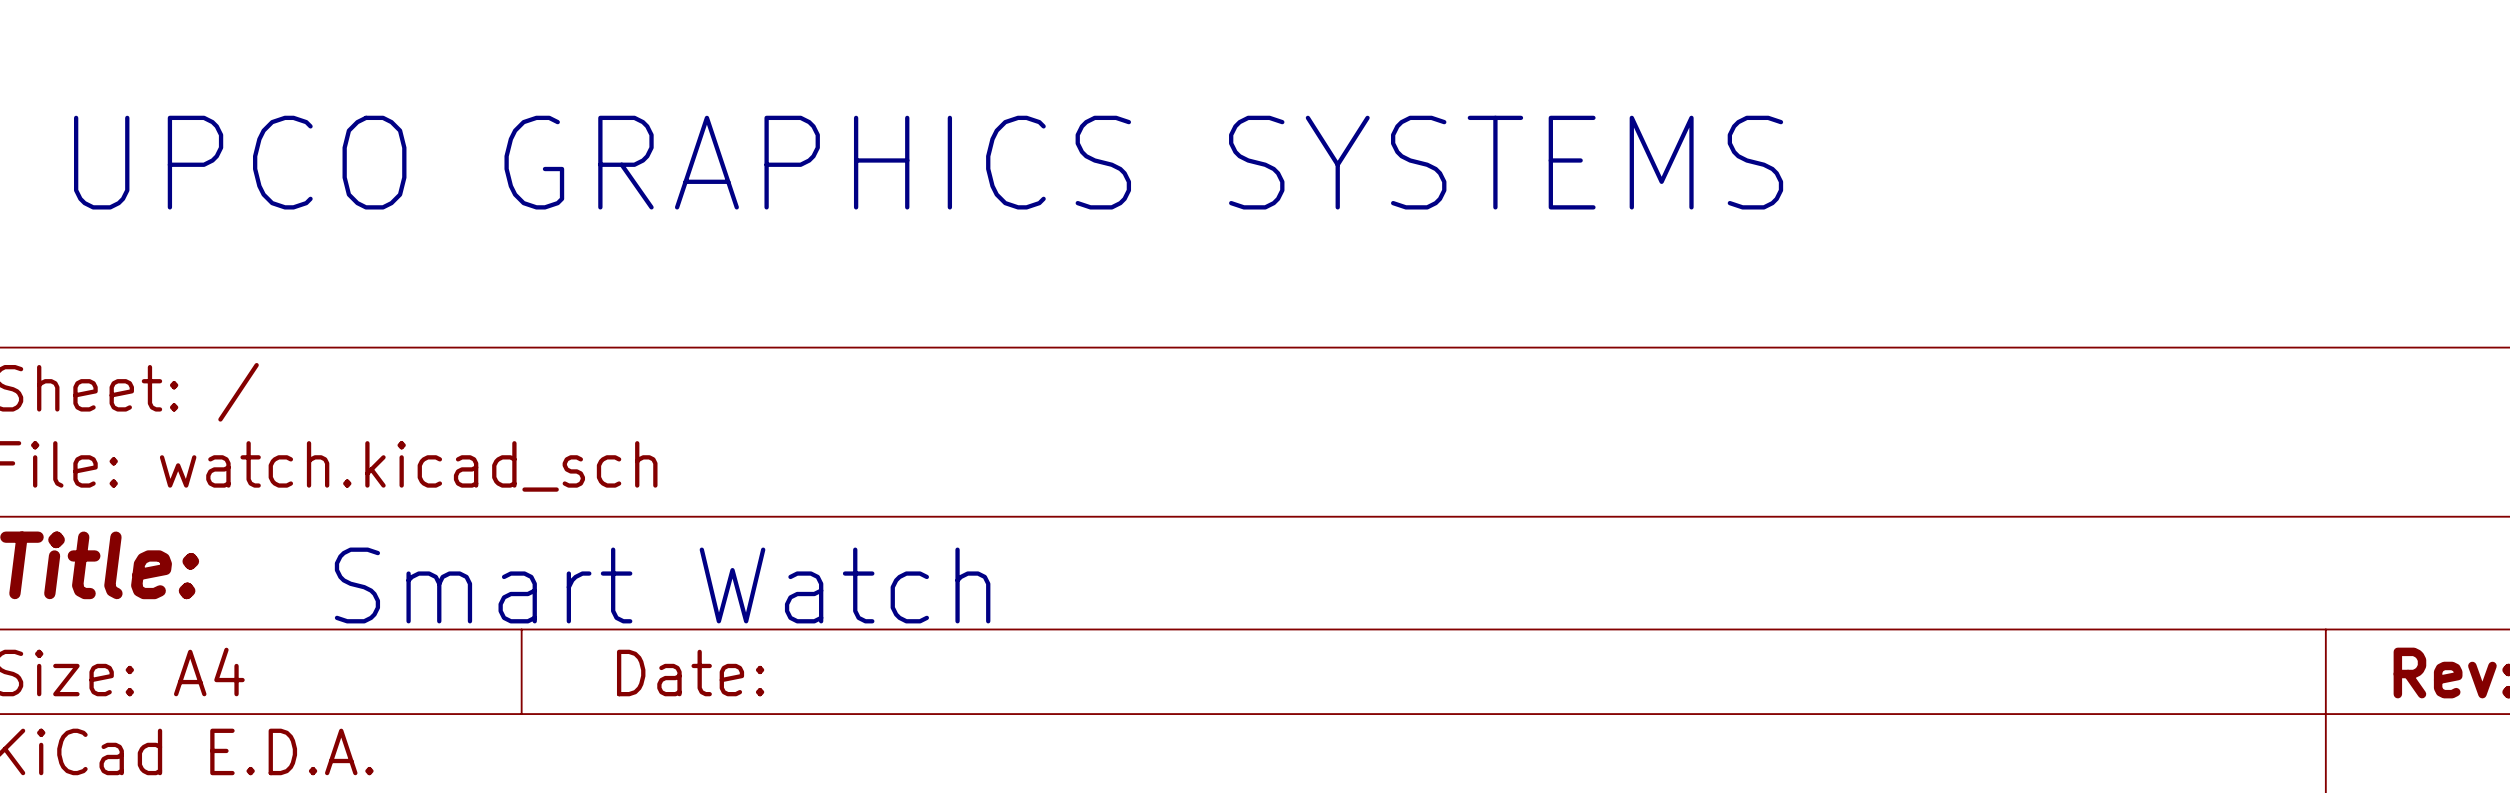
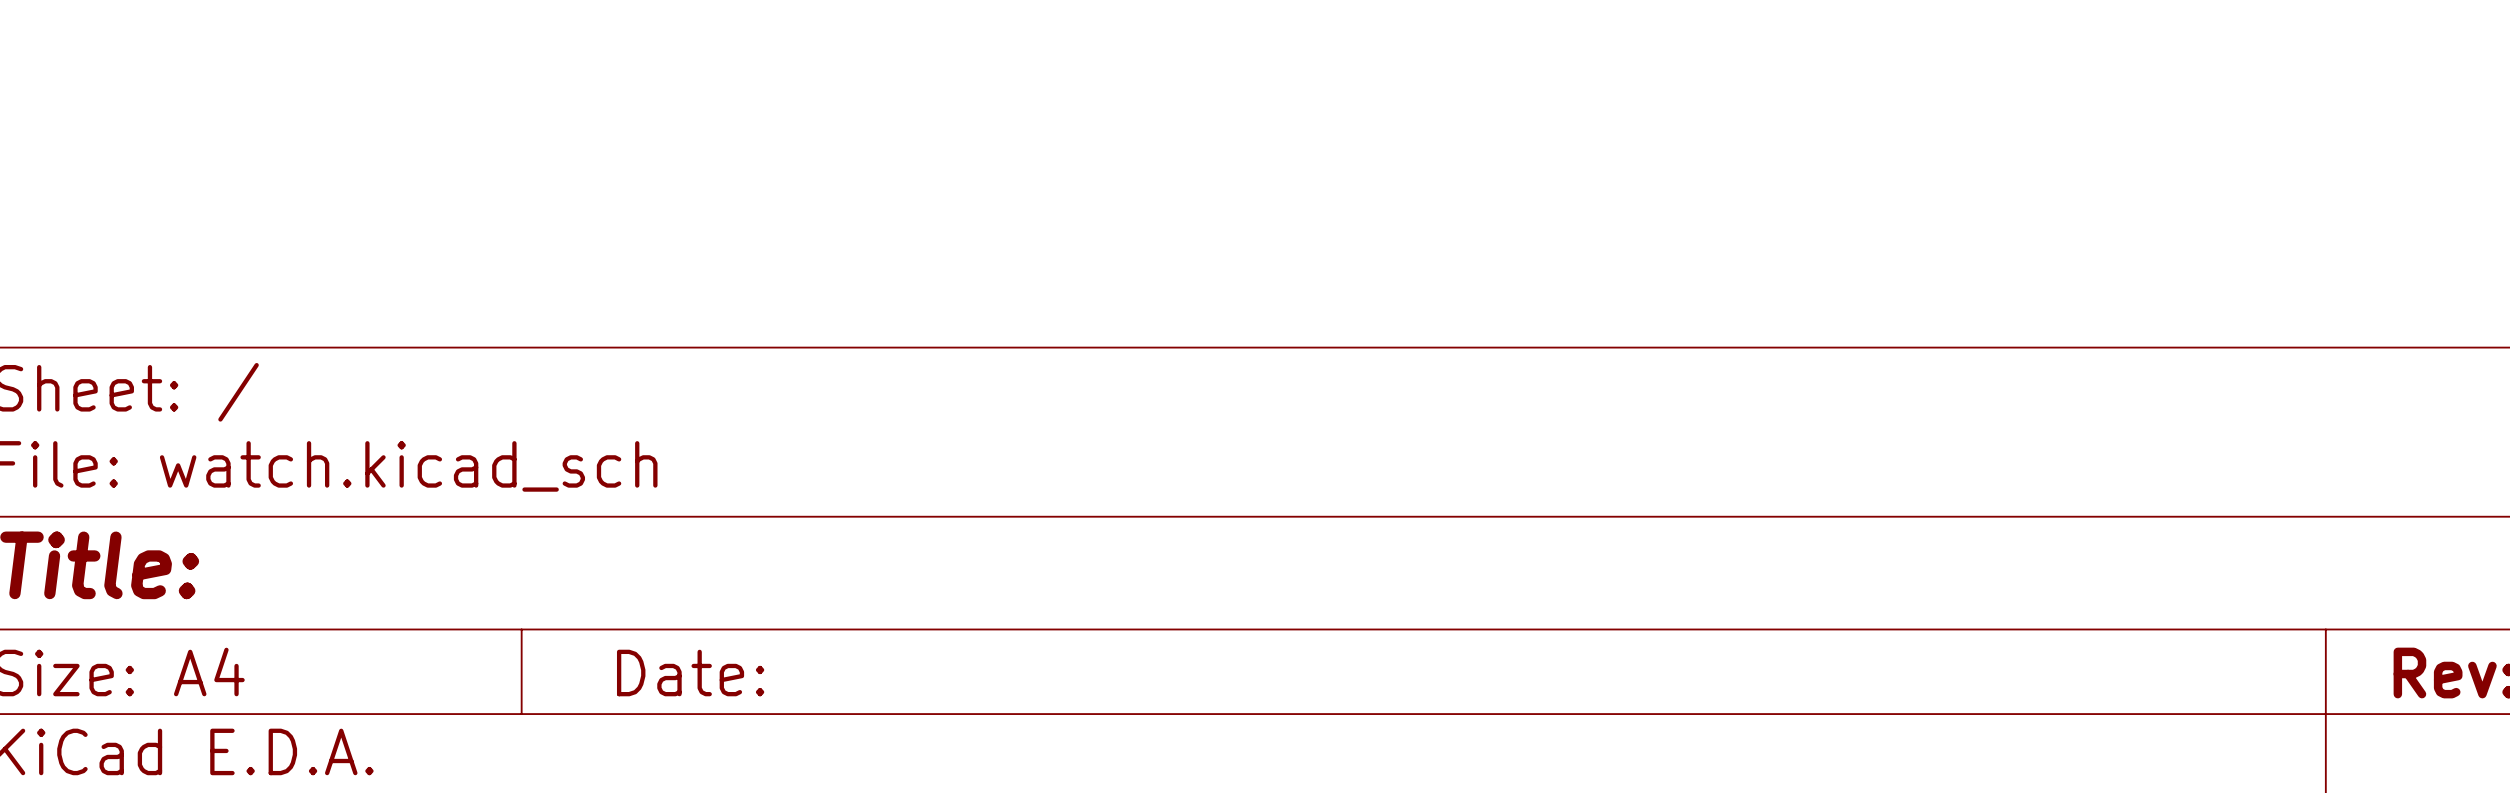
text: UPCO GRAPHICS SYSTEMS (928, 162) -> none
text: Smart Watch (662, 585) -> none

